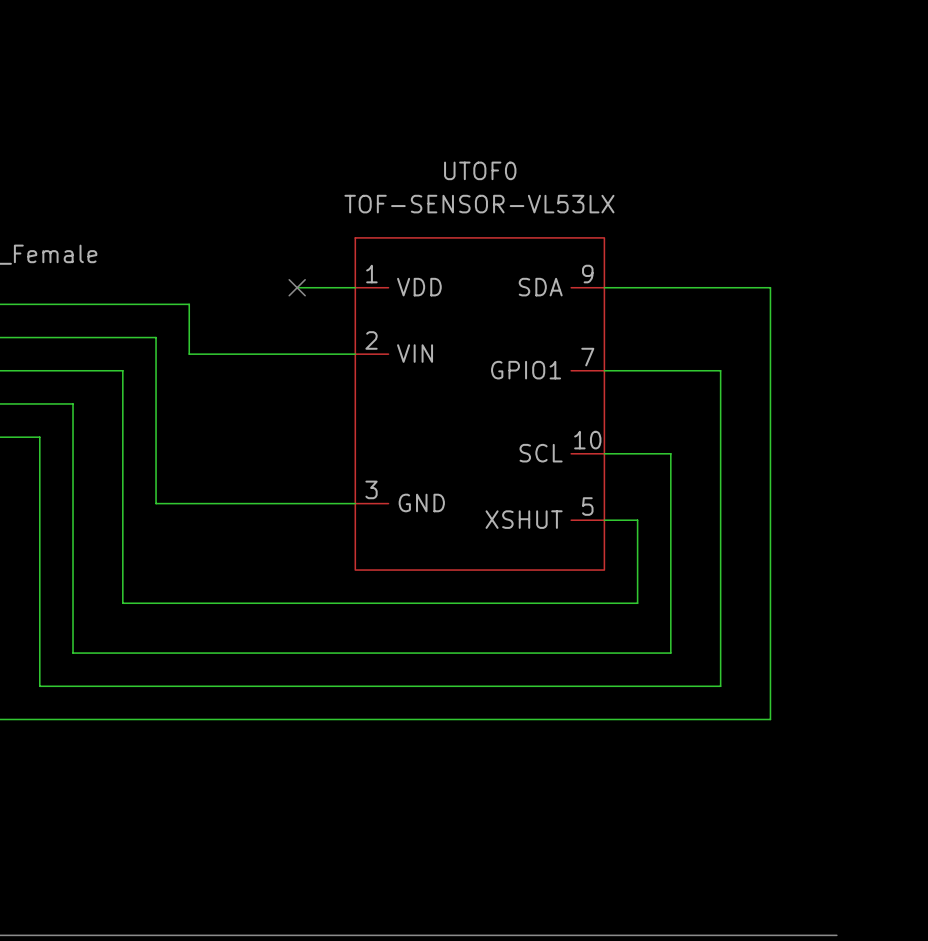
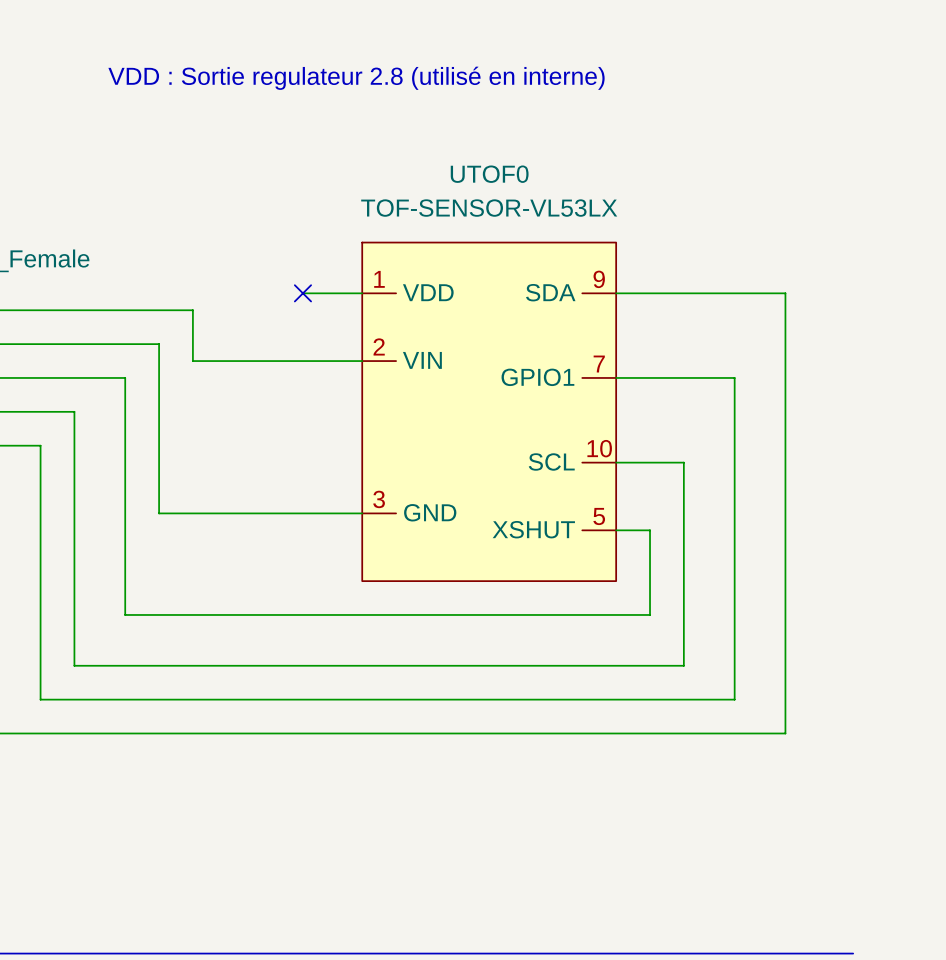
text: none -> VDD : Sortie regulateur 2.8 (utilisé en interne) (356, 78)

